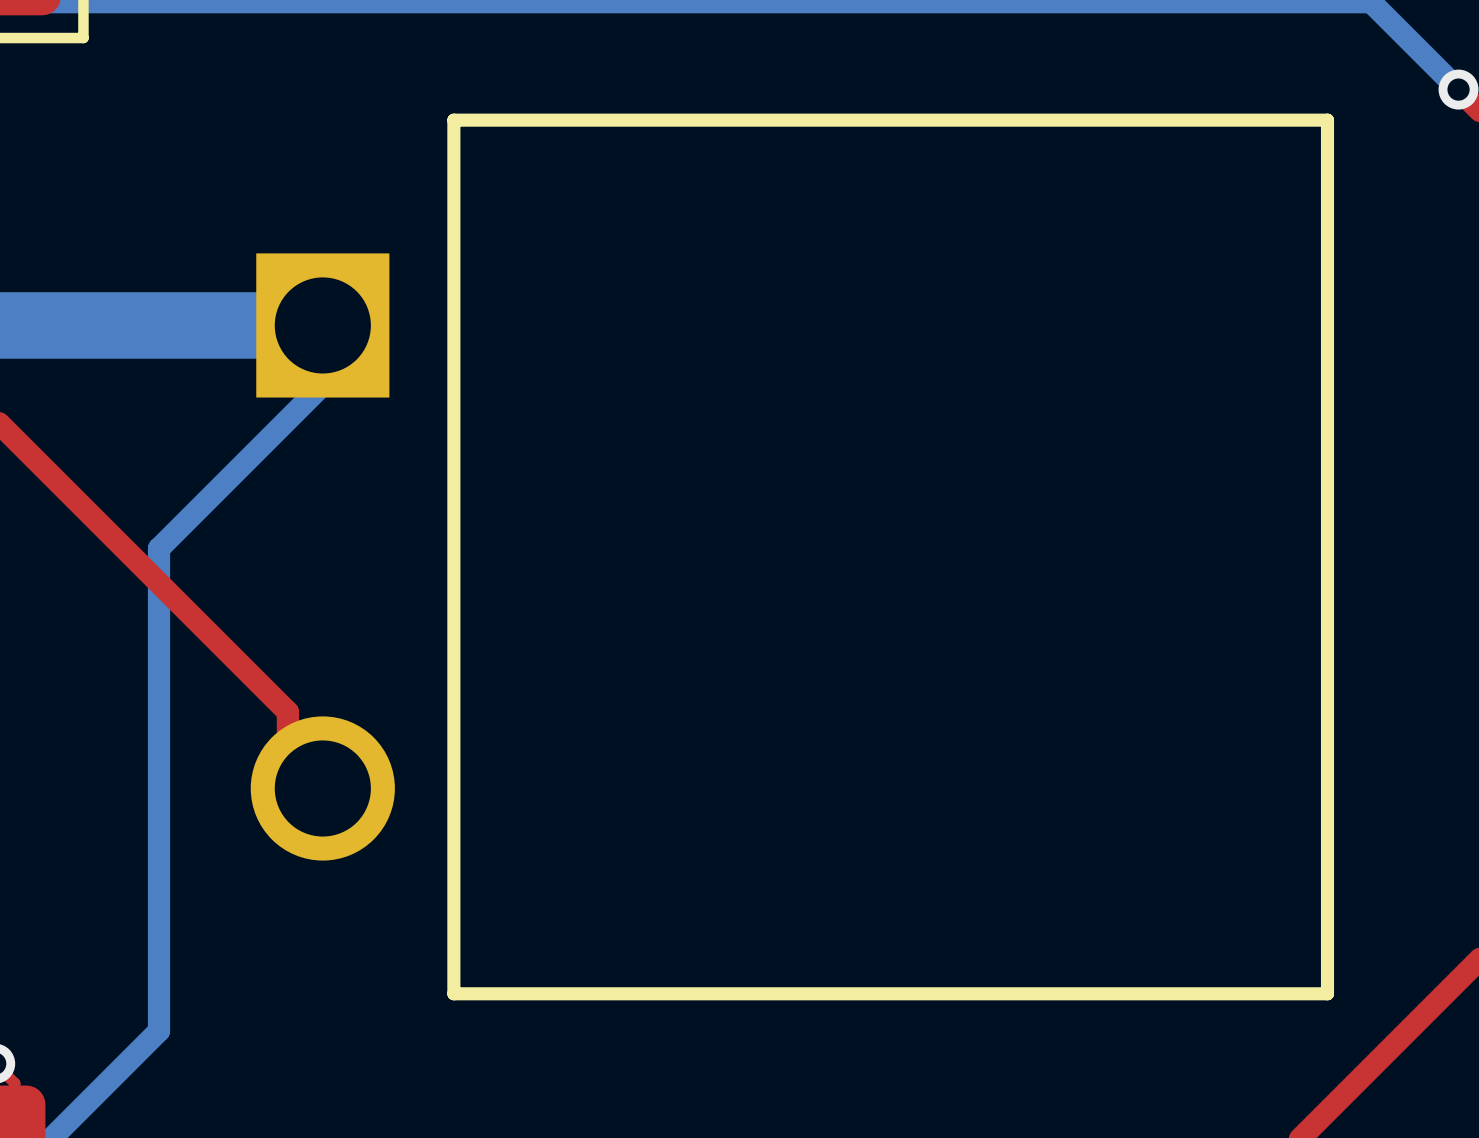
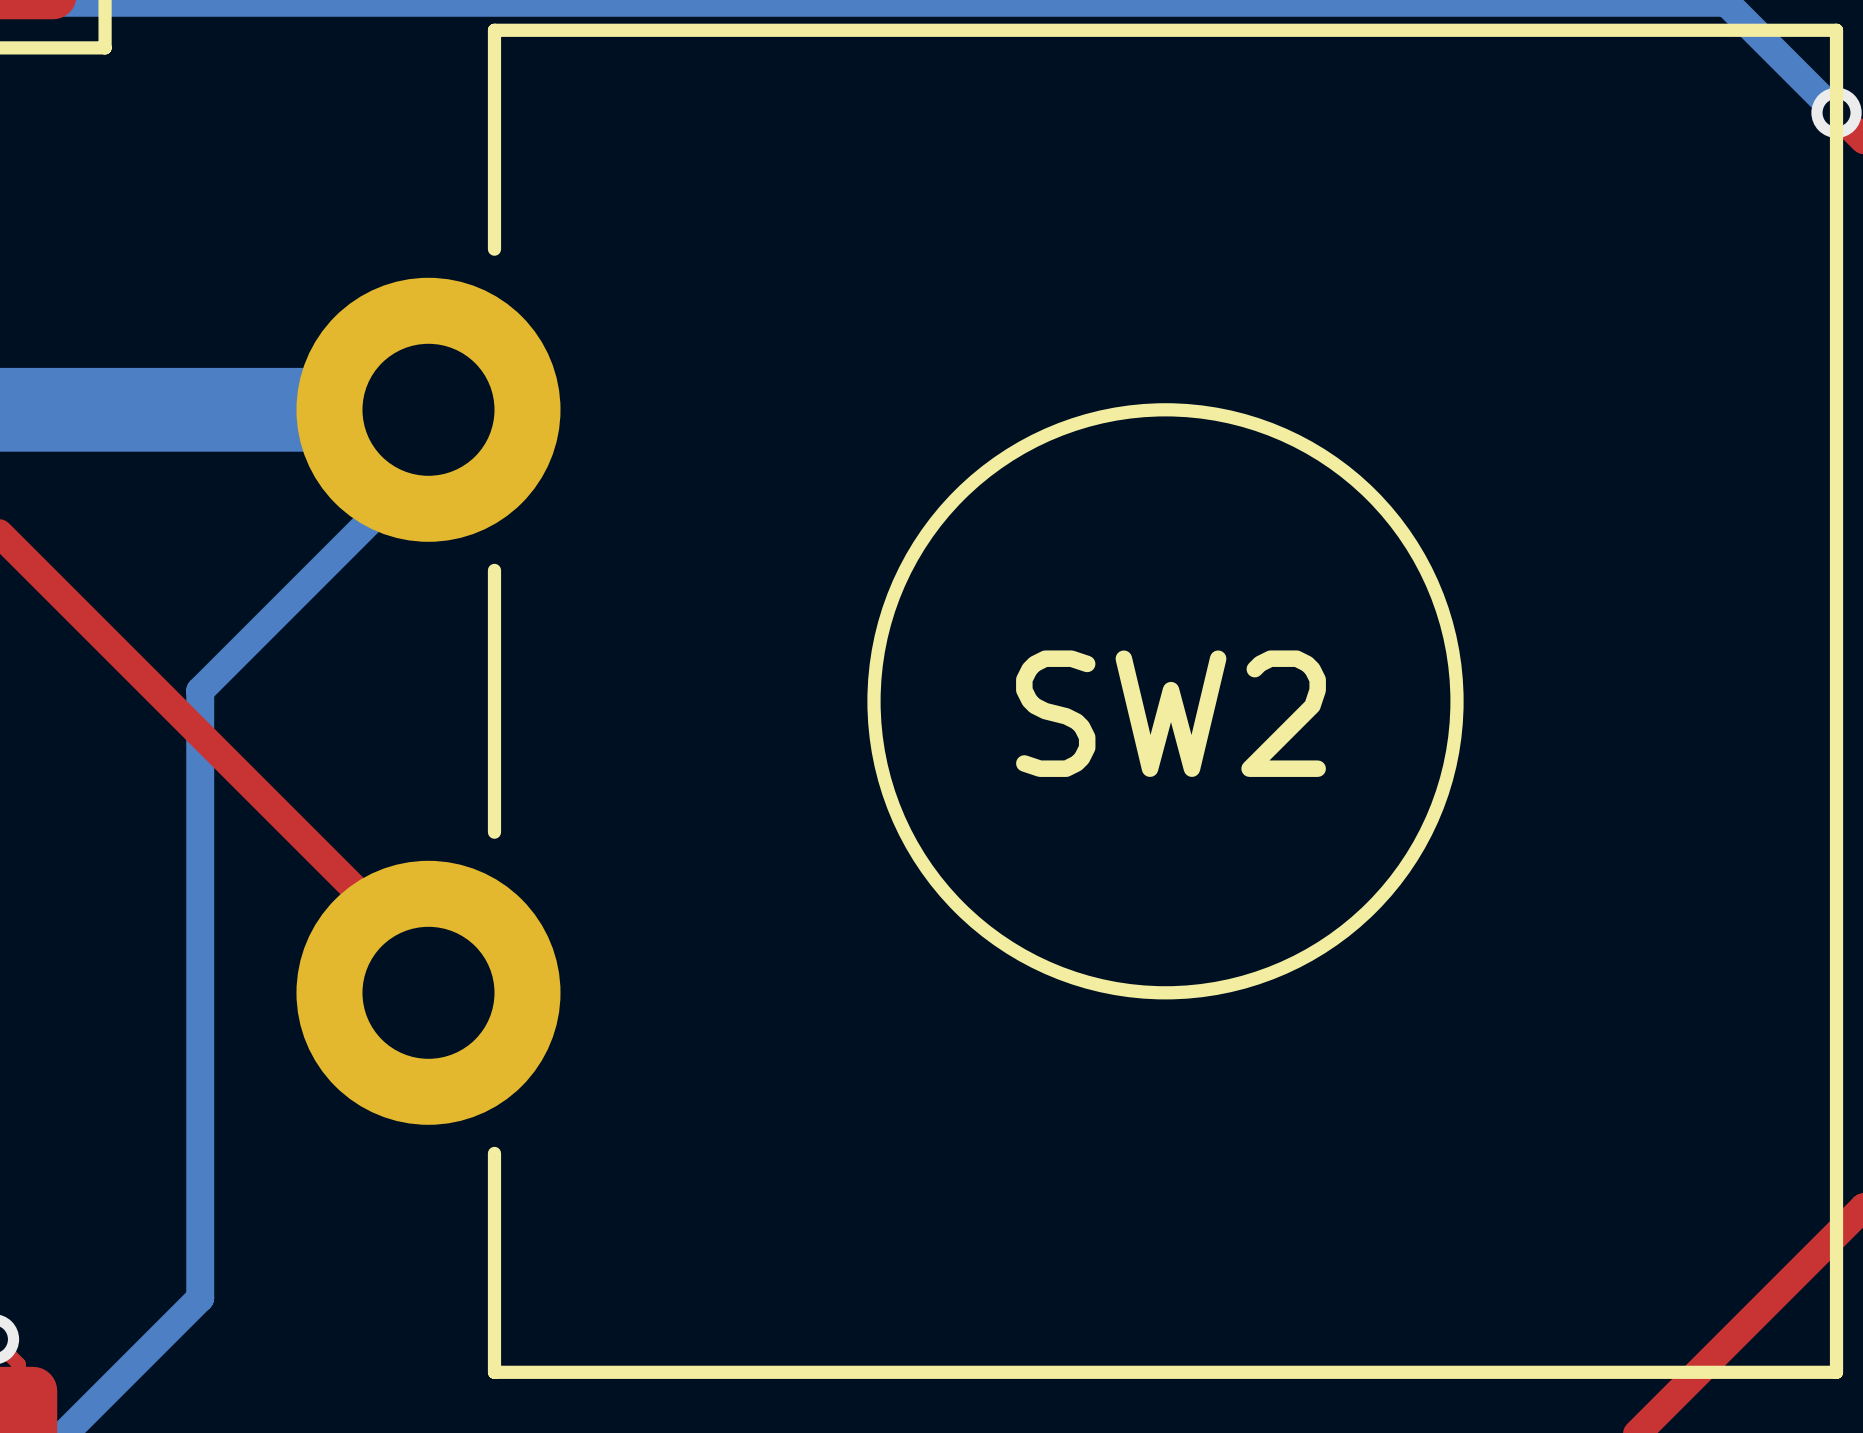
part: (792, 556) -> none
SW2: none -> (1069, 701)

